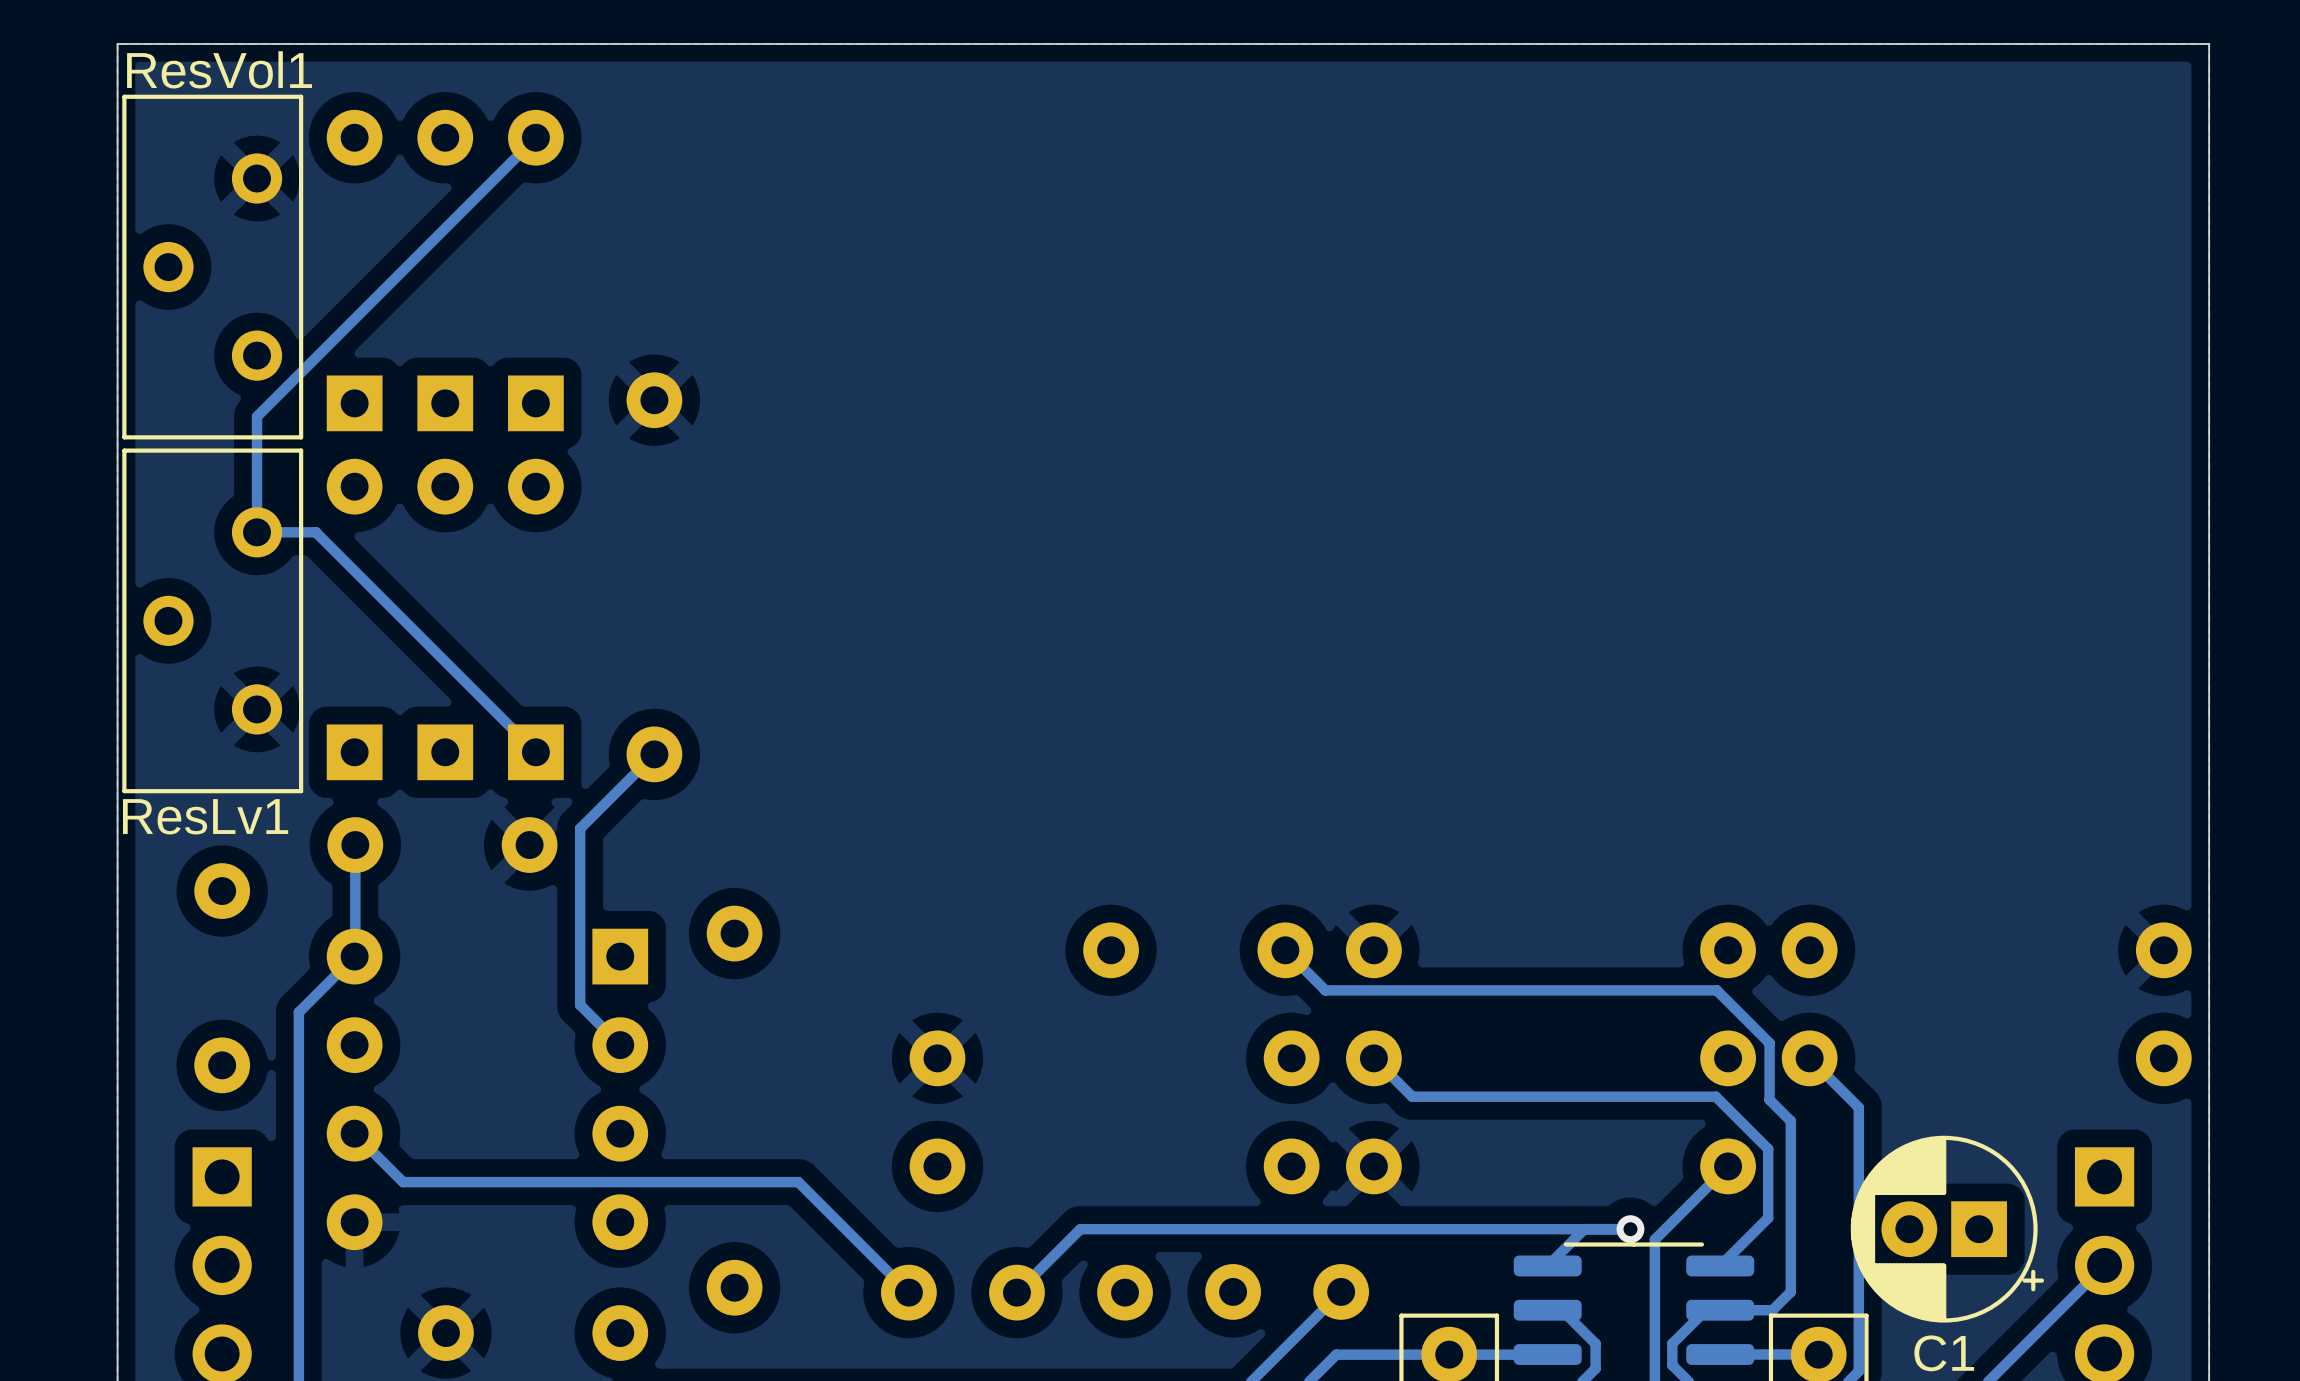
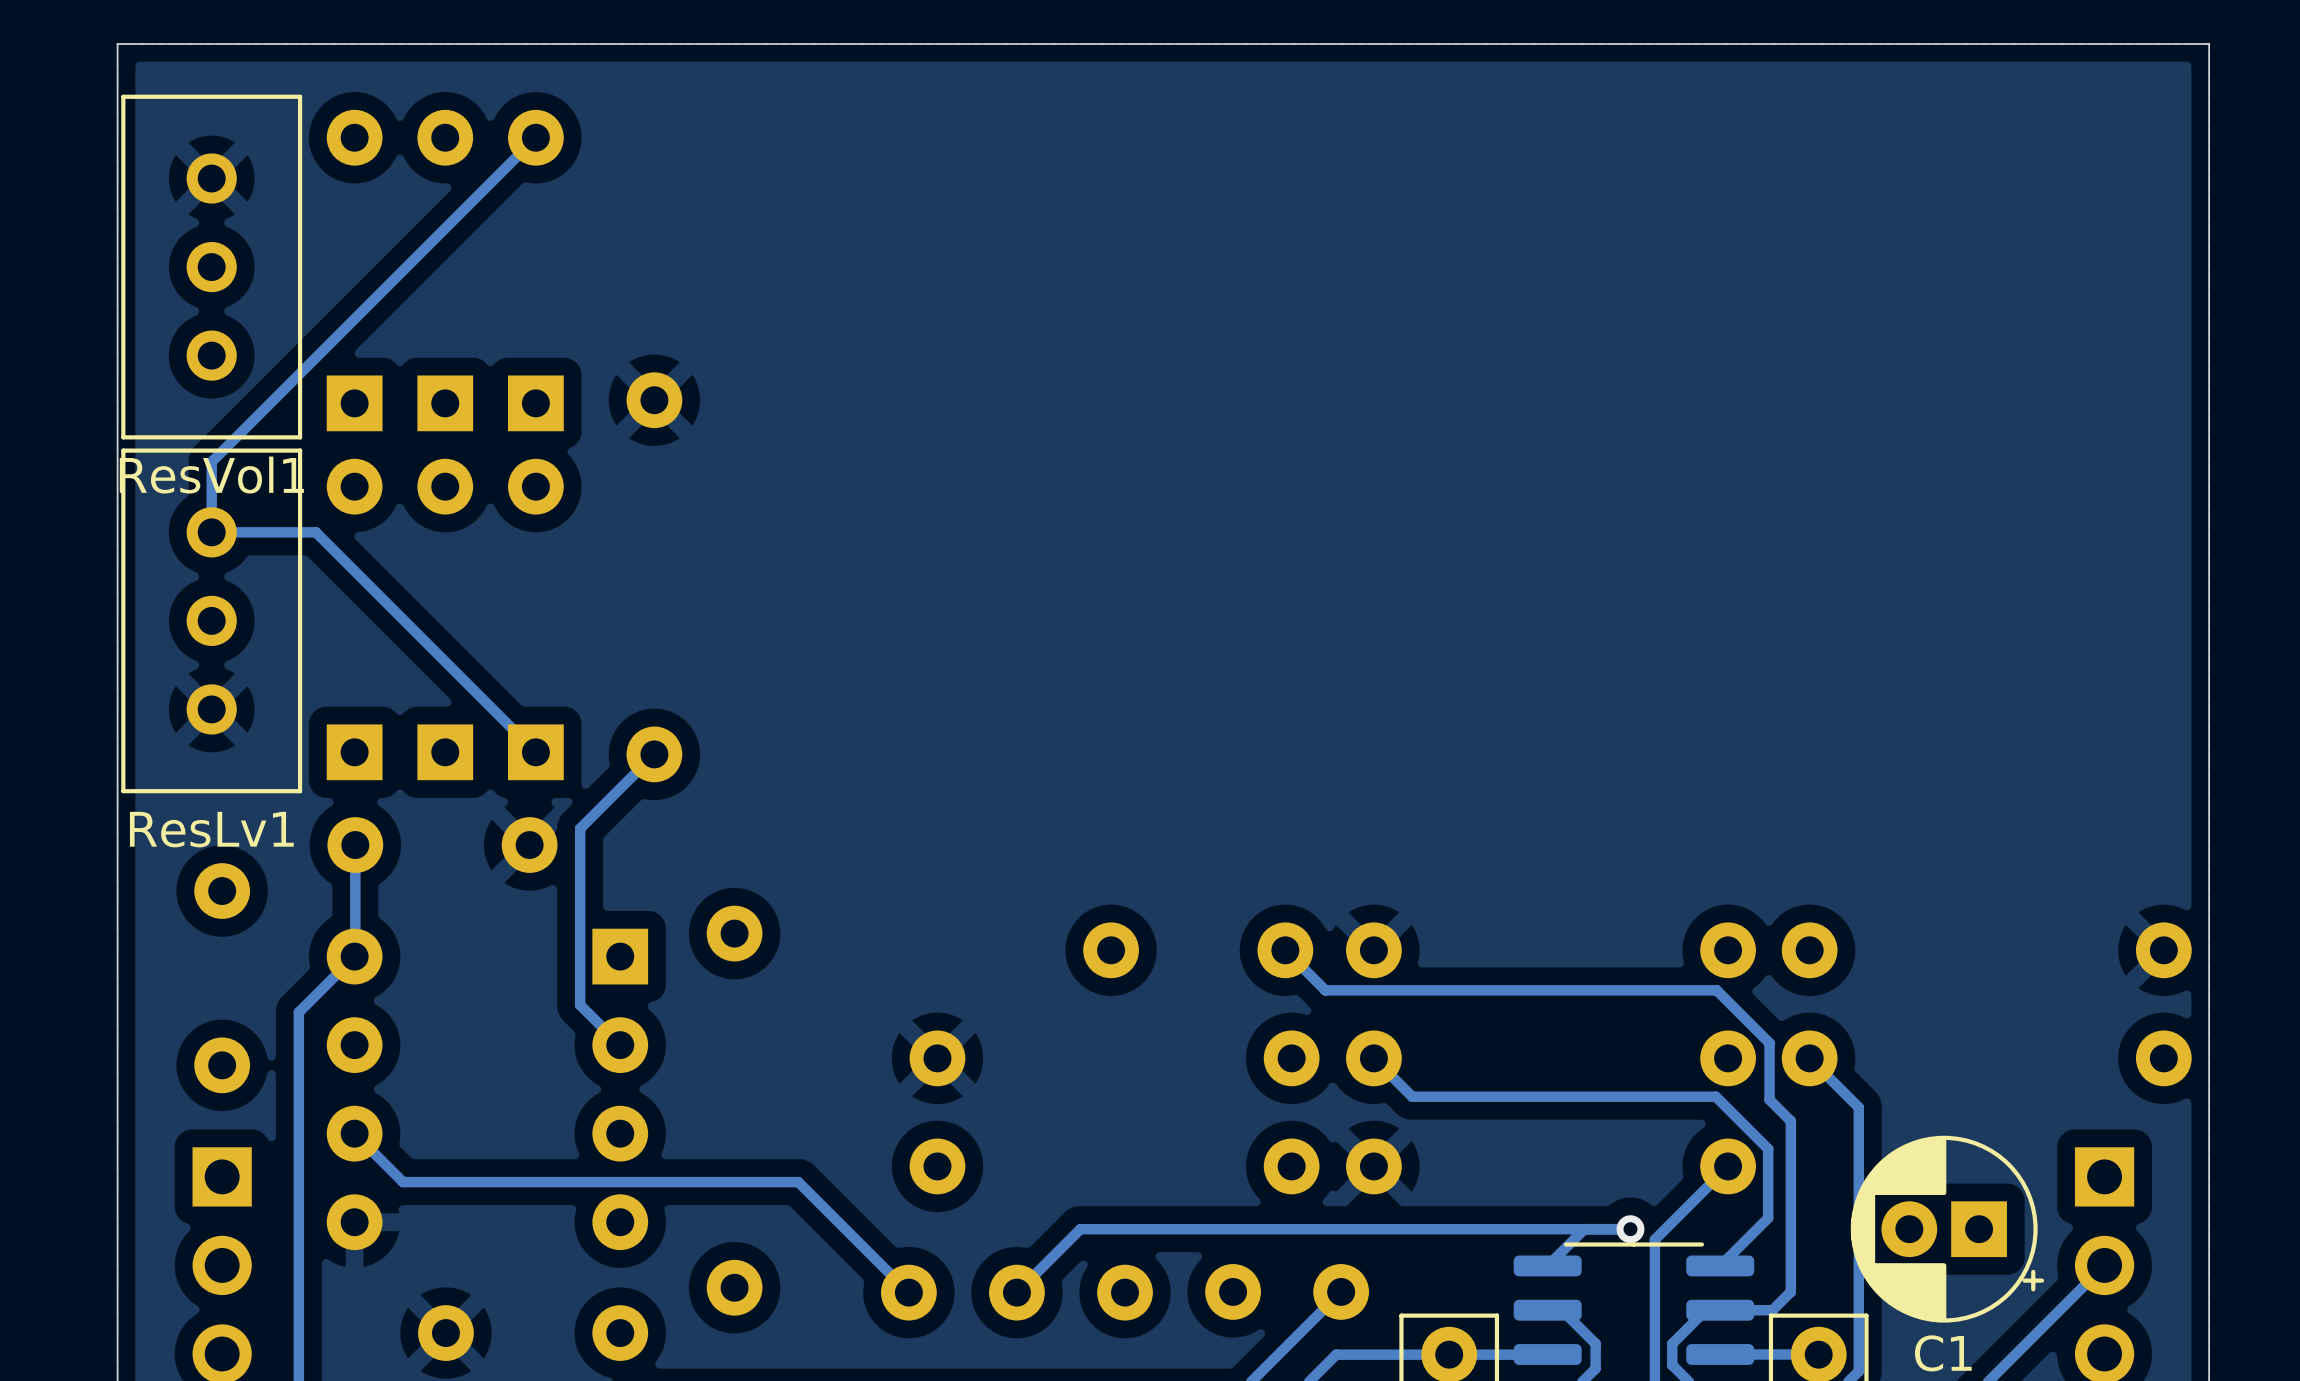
ResVol1 name position: ResVol1 (219, 69) -> ResVol1 (211, 475)
ResVol1 footprint: [122, 94, 304, 440] -> [121, 94, 303, 440]
track: (257, 416) (257, 532) -> (257, 416) (211, 461) (211, 532) (257, 532)
ResLv1 footprint: [122, 448, 304, 794] -> [121, 448, 303, 794]

